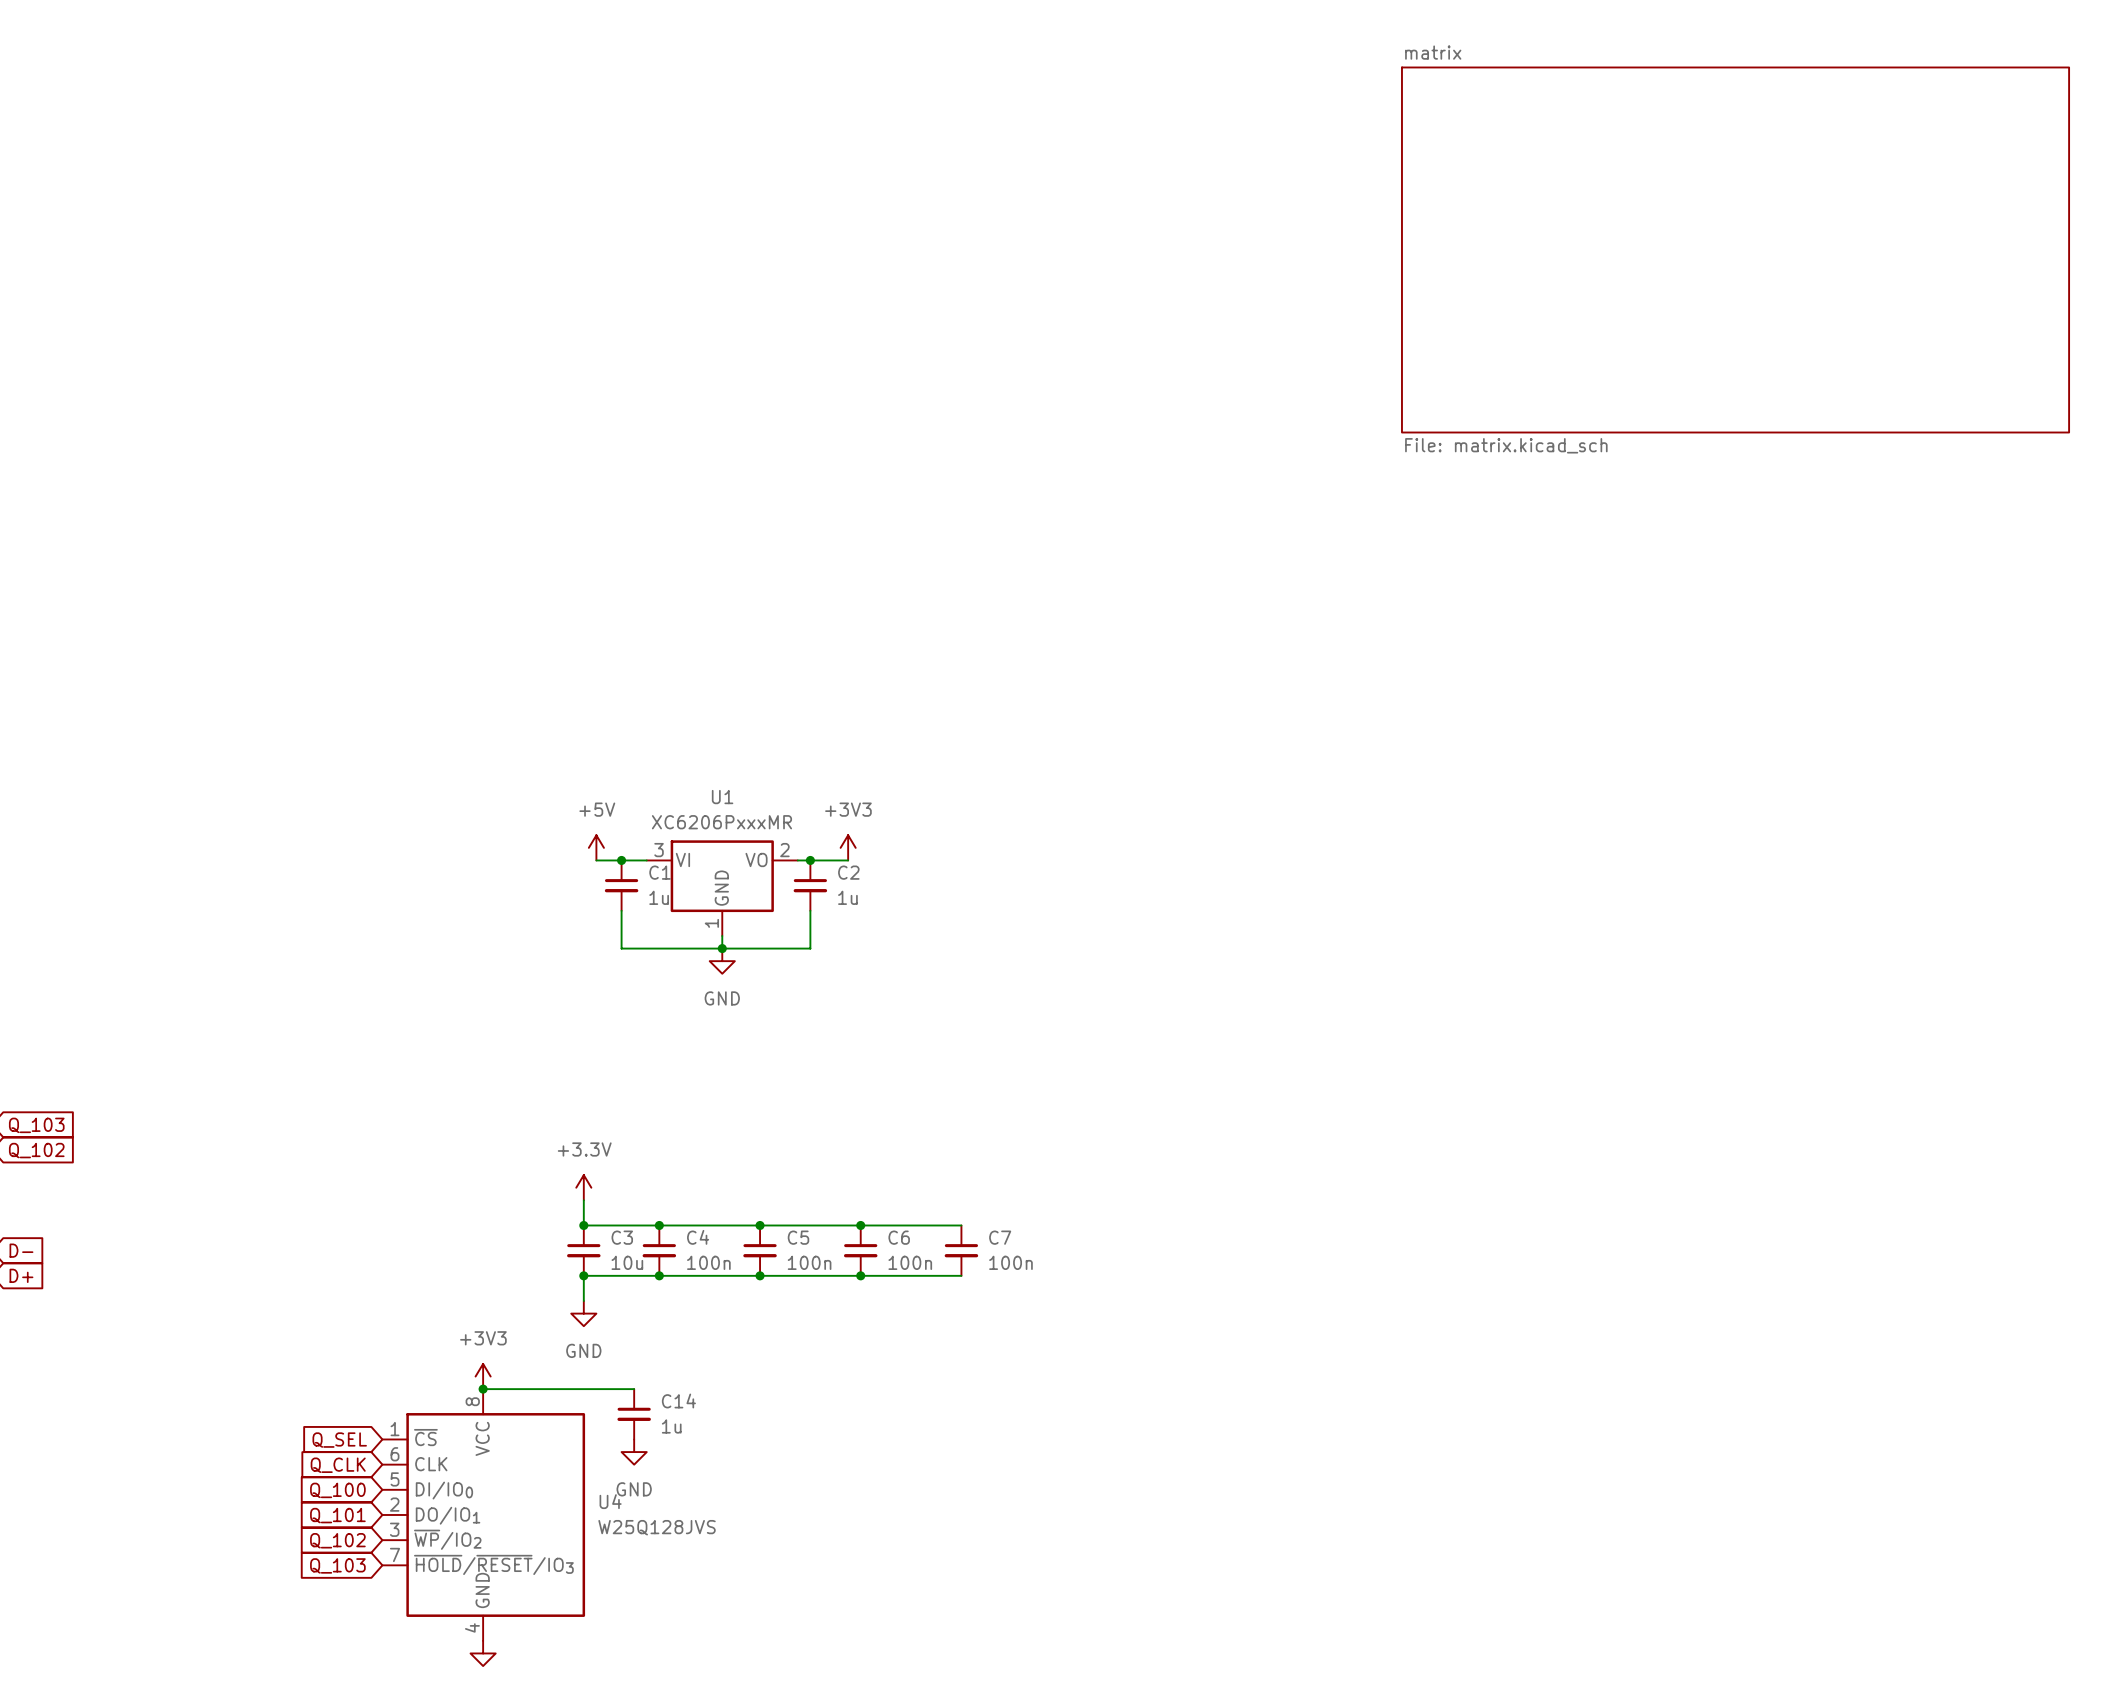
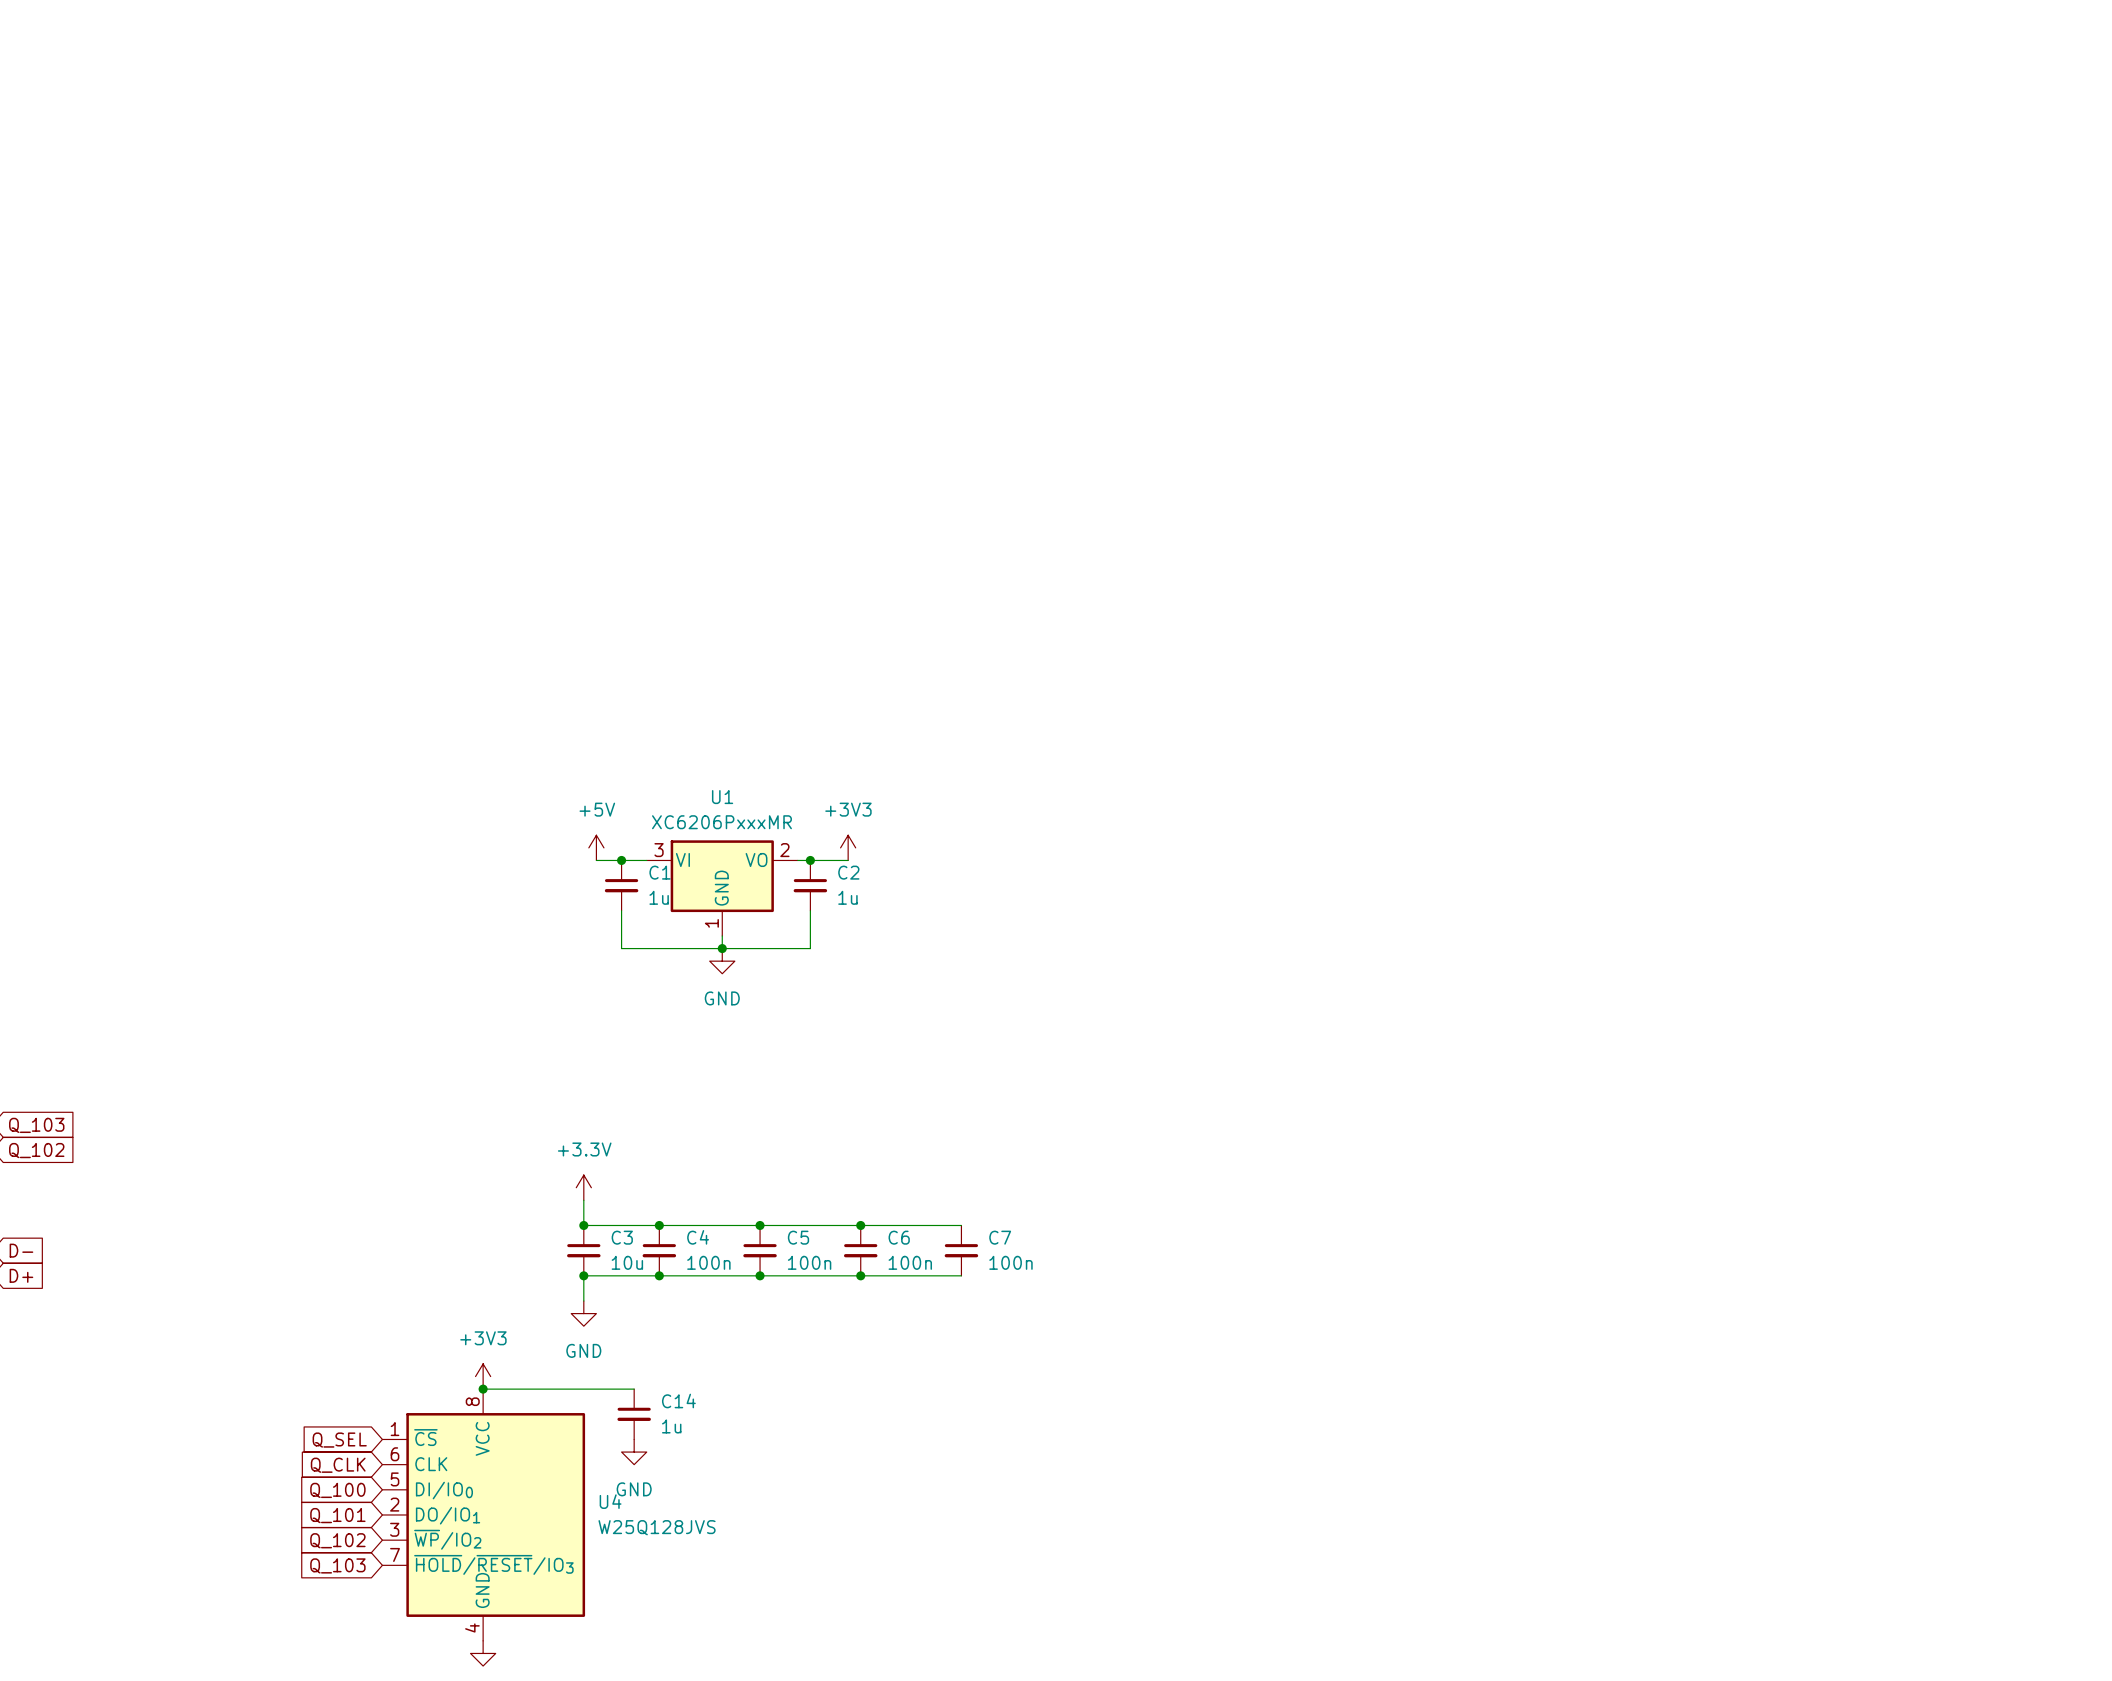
sheet matrix: File: matrix.kicad_sch (1735, 249) -> none

